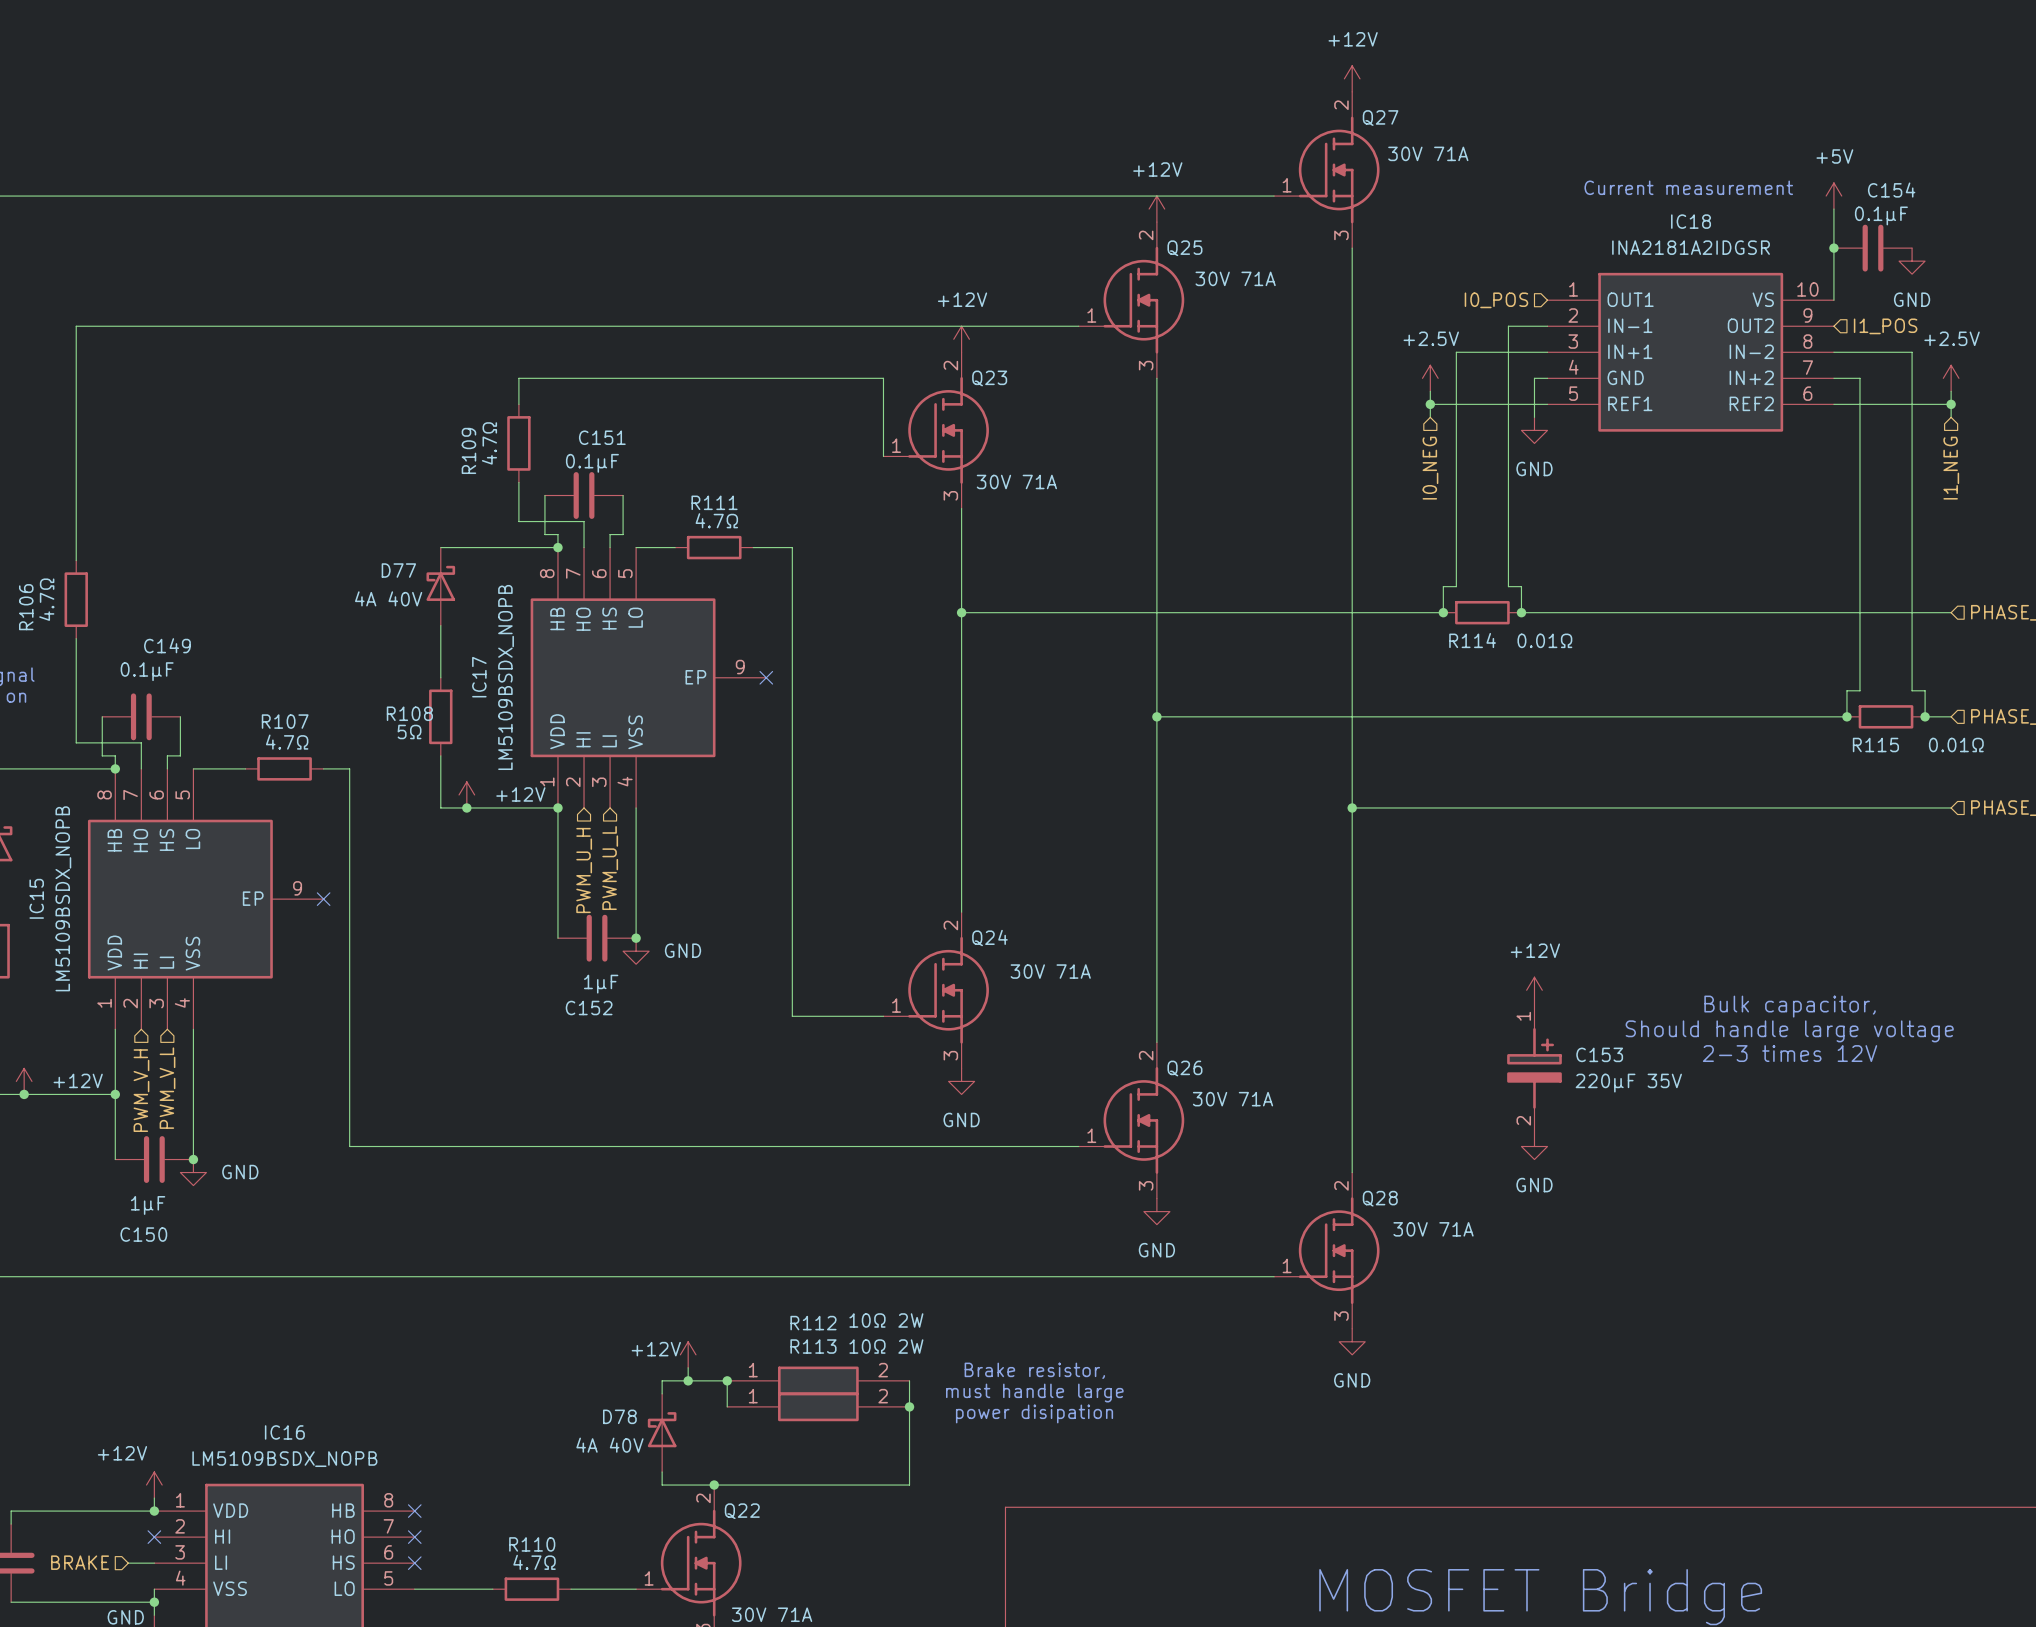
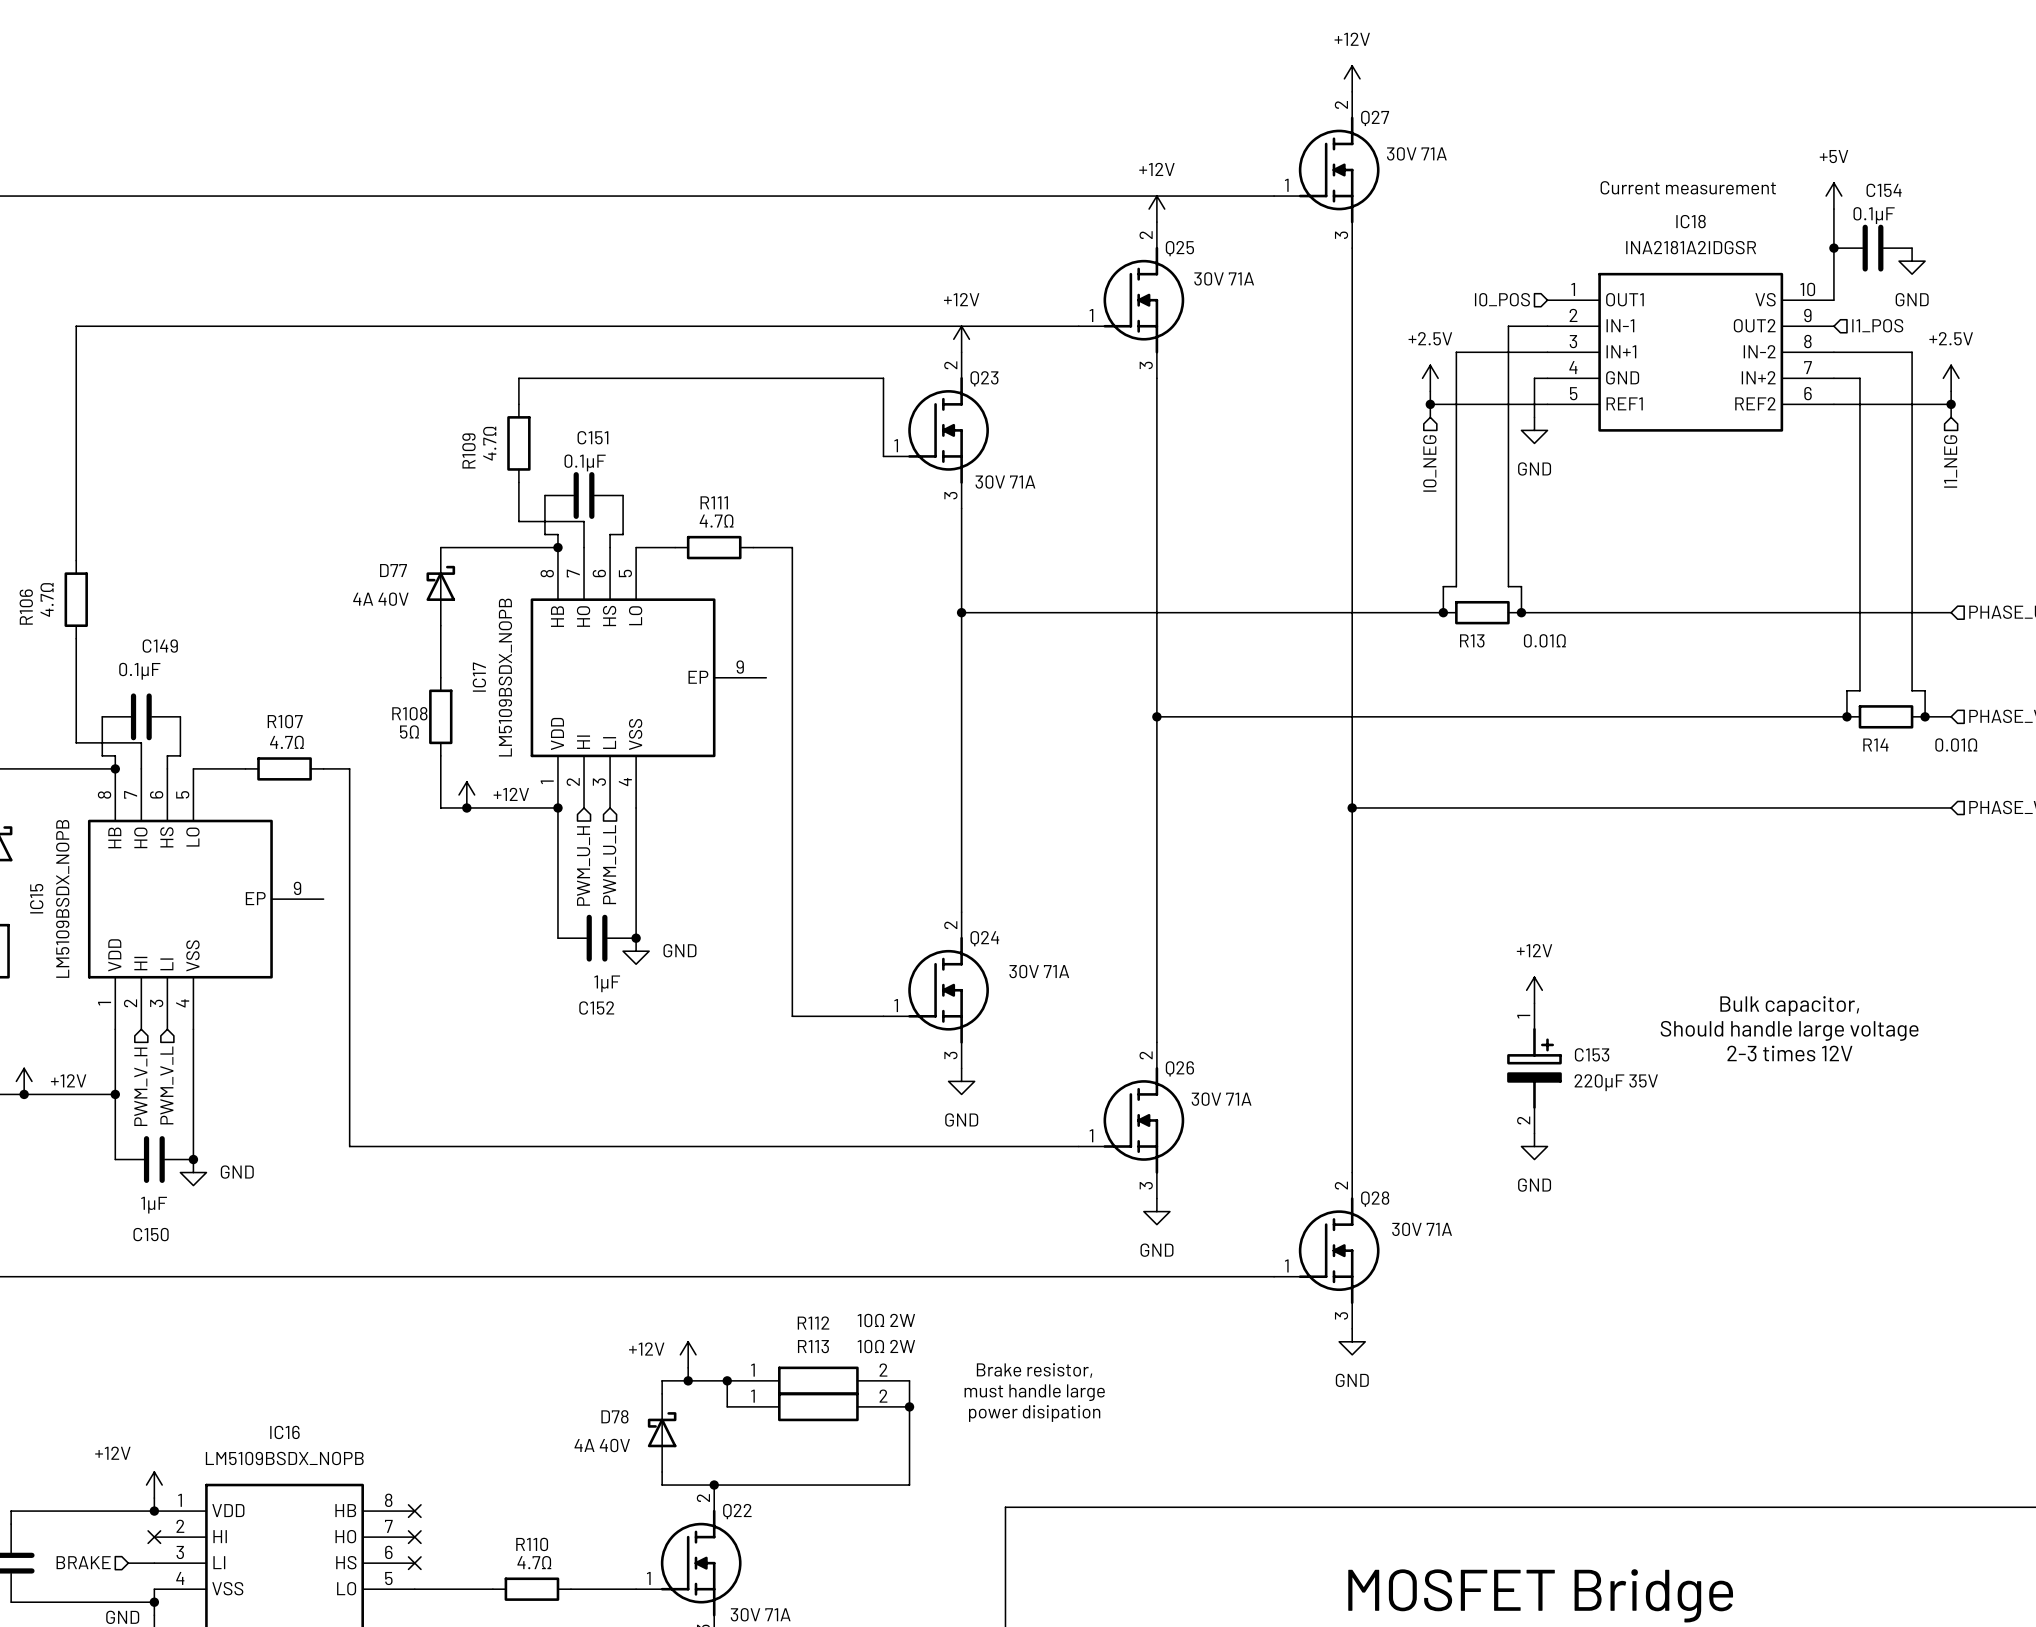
R114 name: R114 (1472, 640) -> R13 (1472, 640)
no-connect mark: (766, 677) -> none
R115 name: R115 (1875, 745) -> R14 (1875, 745)
no-connect mark: (323, 899) -> none

